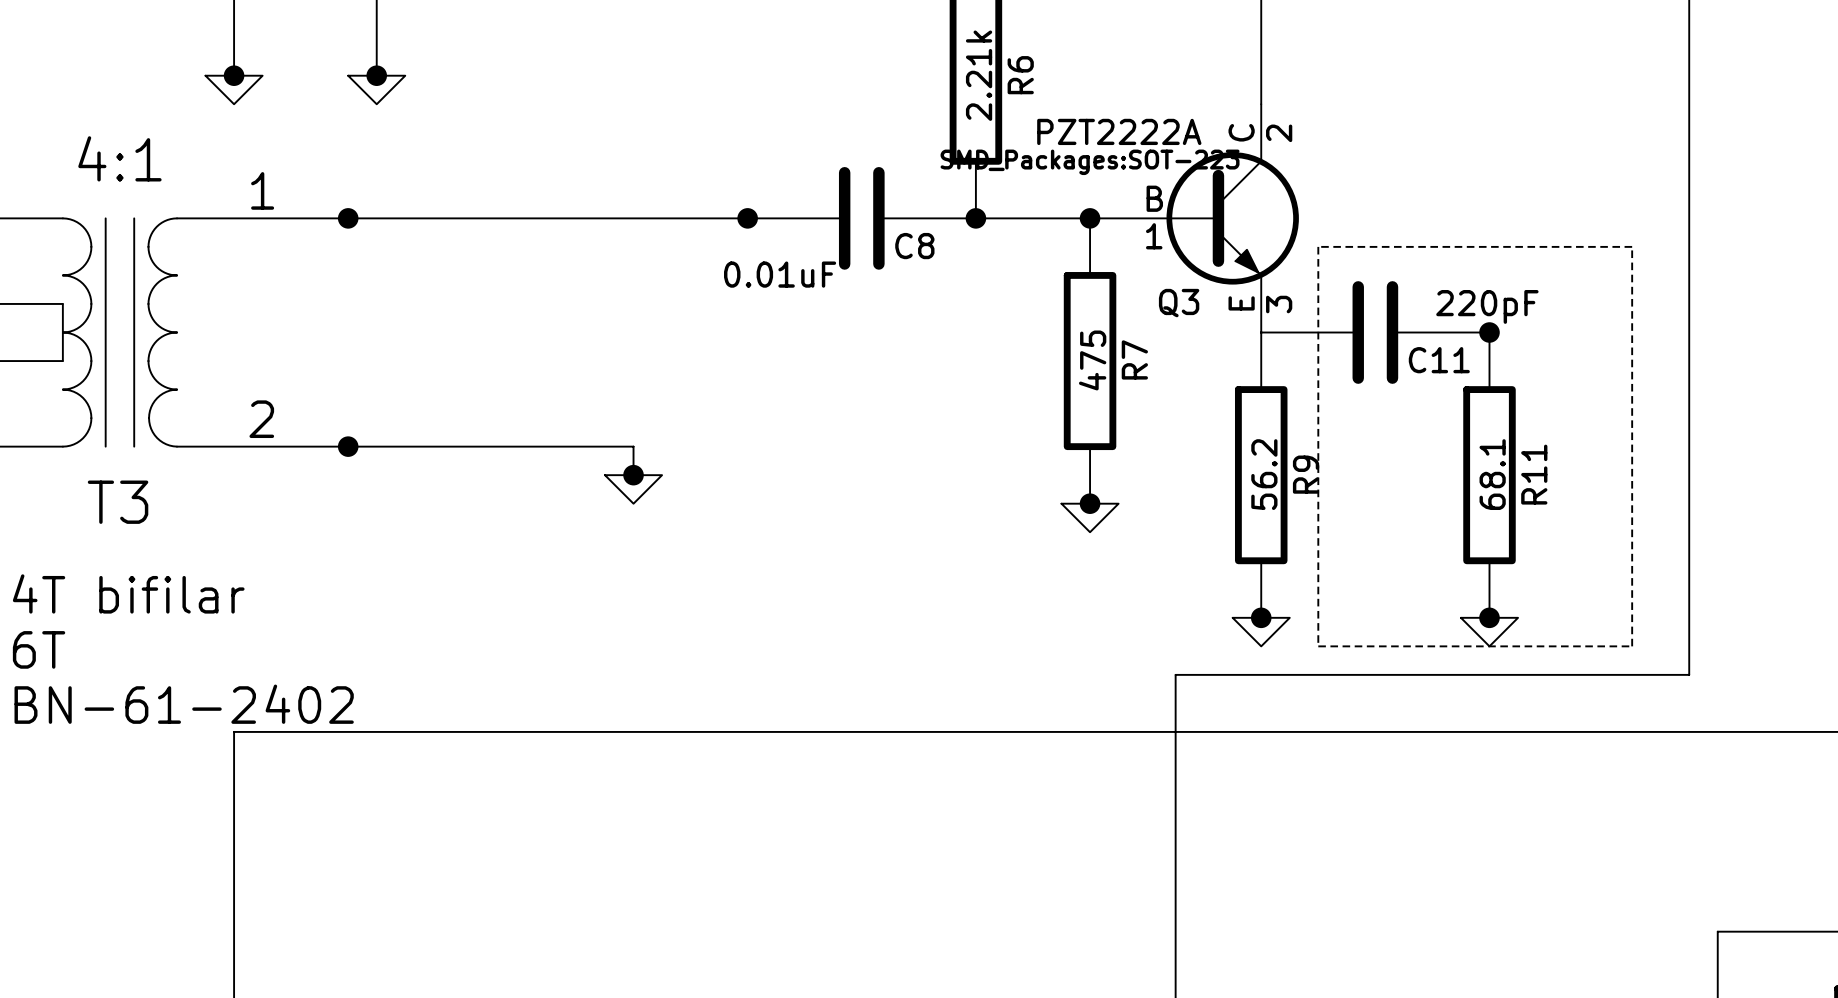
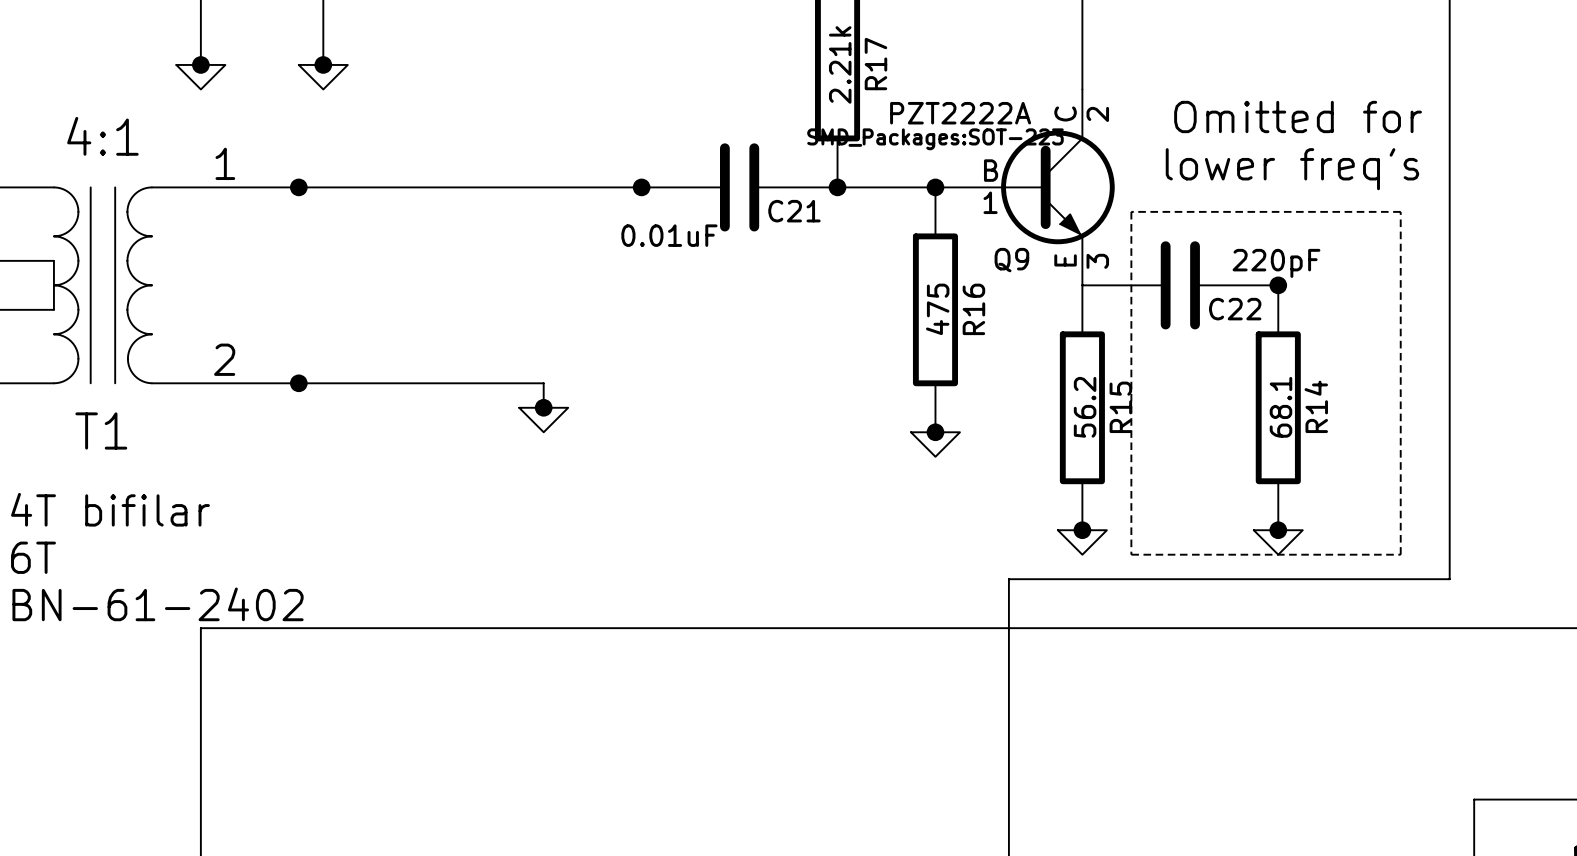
R6 name: R6 (1020, 75) -> R17 (875, 64)
text: none -> Omitted for (1298, 116)
text: none -> lower freq's (1292, 169)
C8 name: C8 (914, 246) -> C21 (794, 211)
Q3 name: Q3 (1179, 303) -> Q9 (1011, 260)
R7 name: R7 (1134, 359) -> R16 (973, 309)
C11 name: C11 (1439, 360) -> C22 (1235, 309)
R9 name: R9 (1306, 474) -> R15 (1120, 407)
R11 name: R11 (1534, 474) -> R14 (1316, 406)
T3 name: T3 (118, 502) -> T1 (101, 430)

